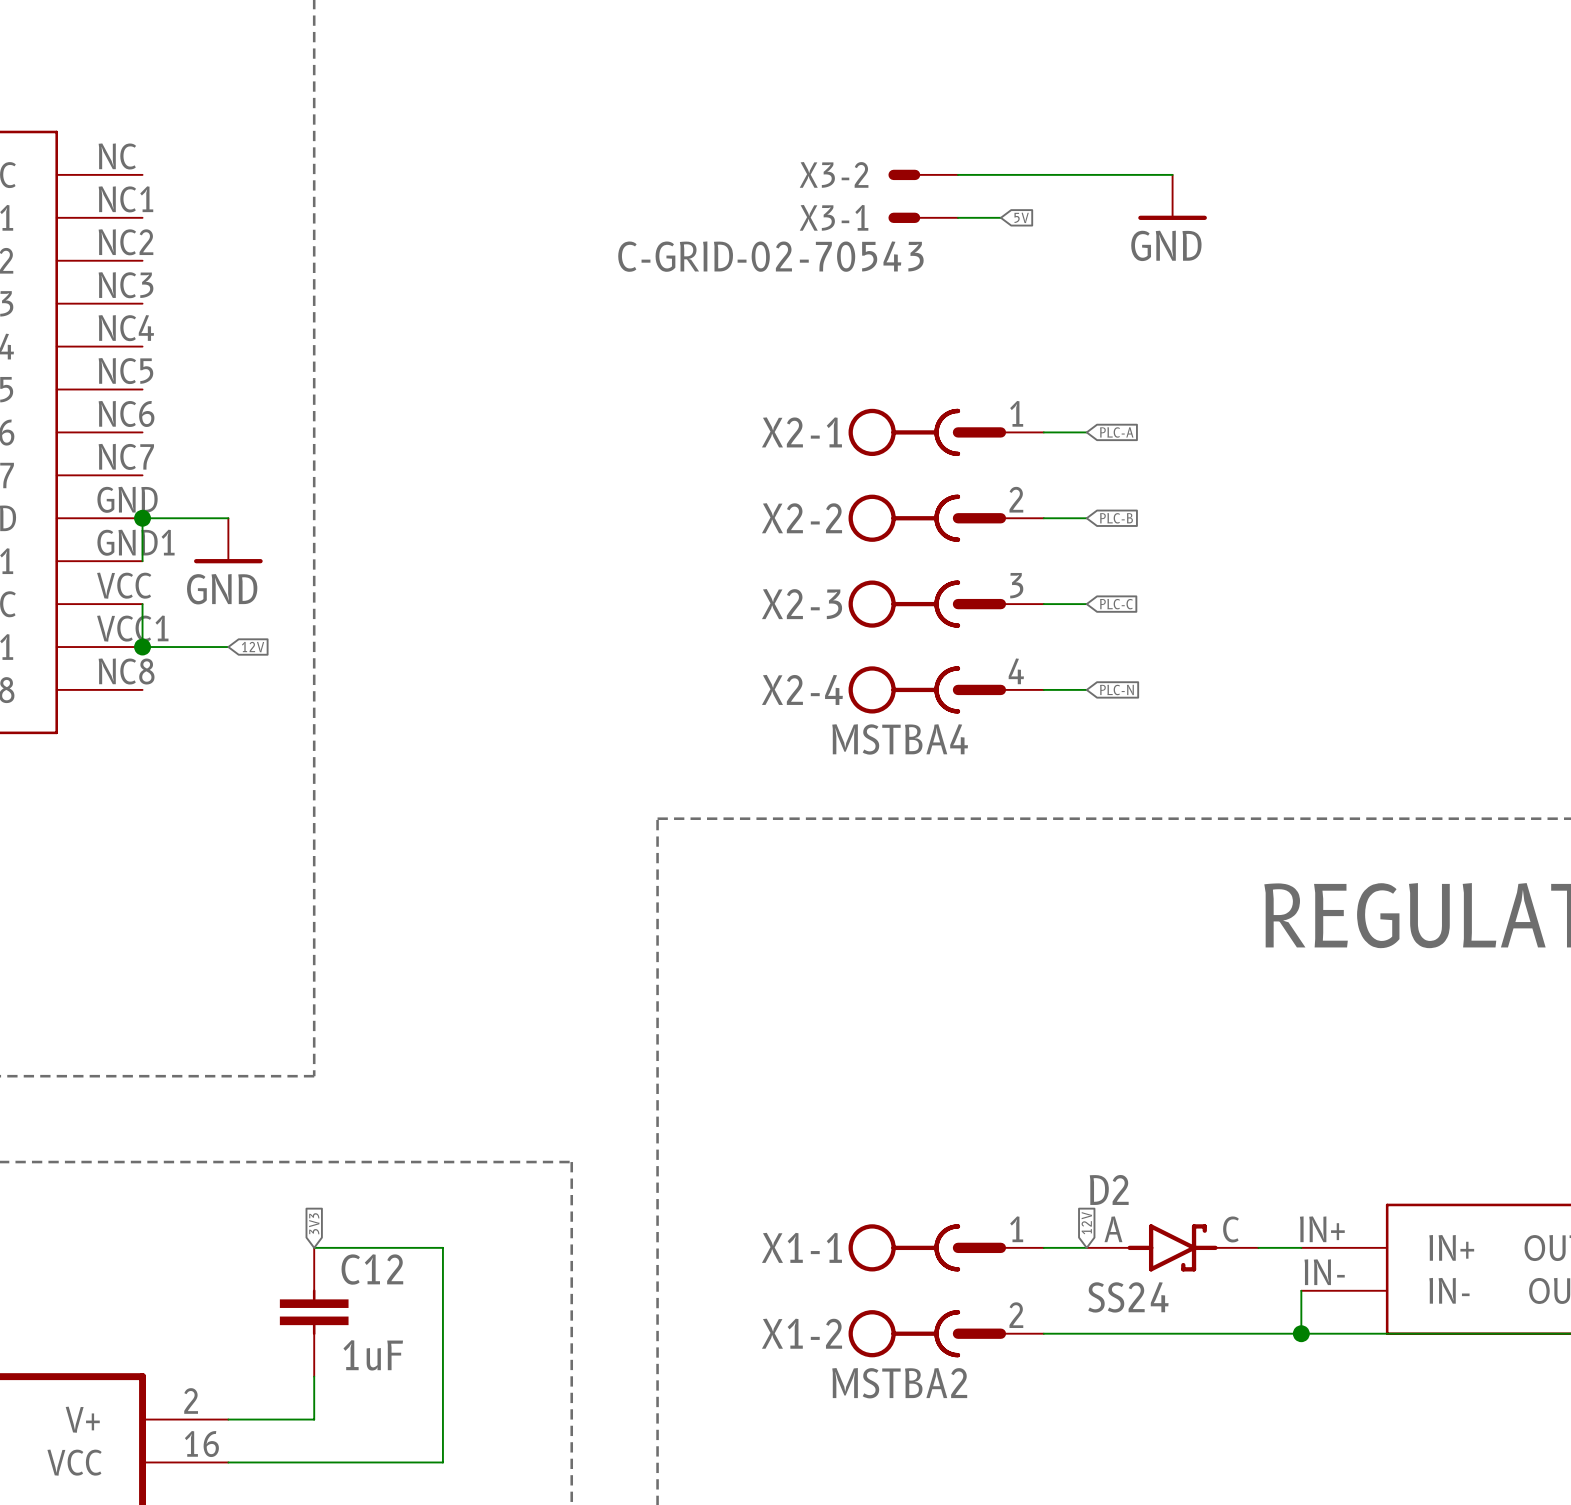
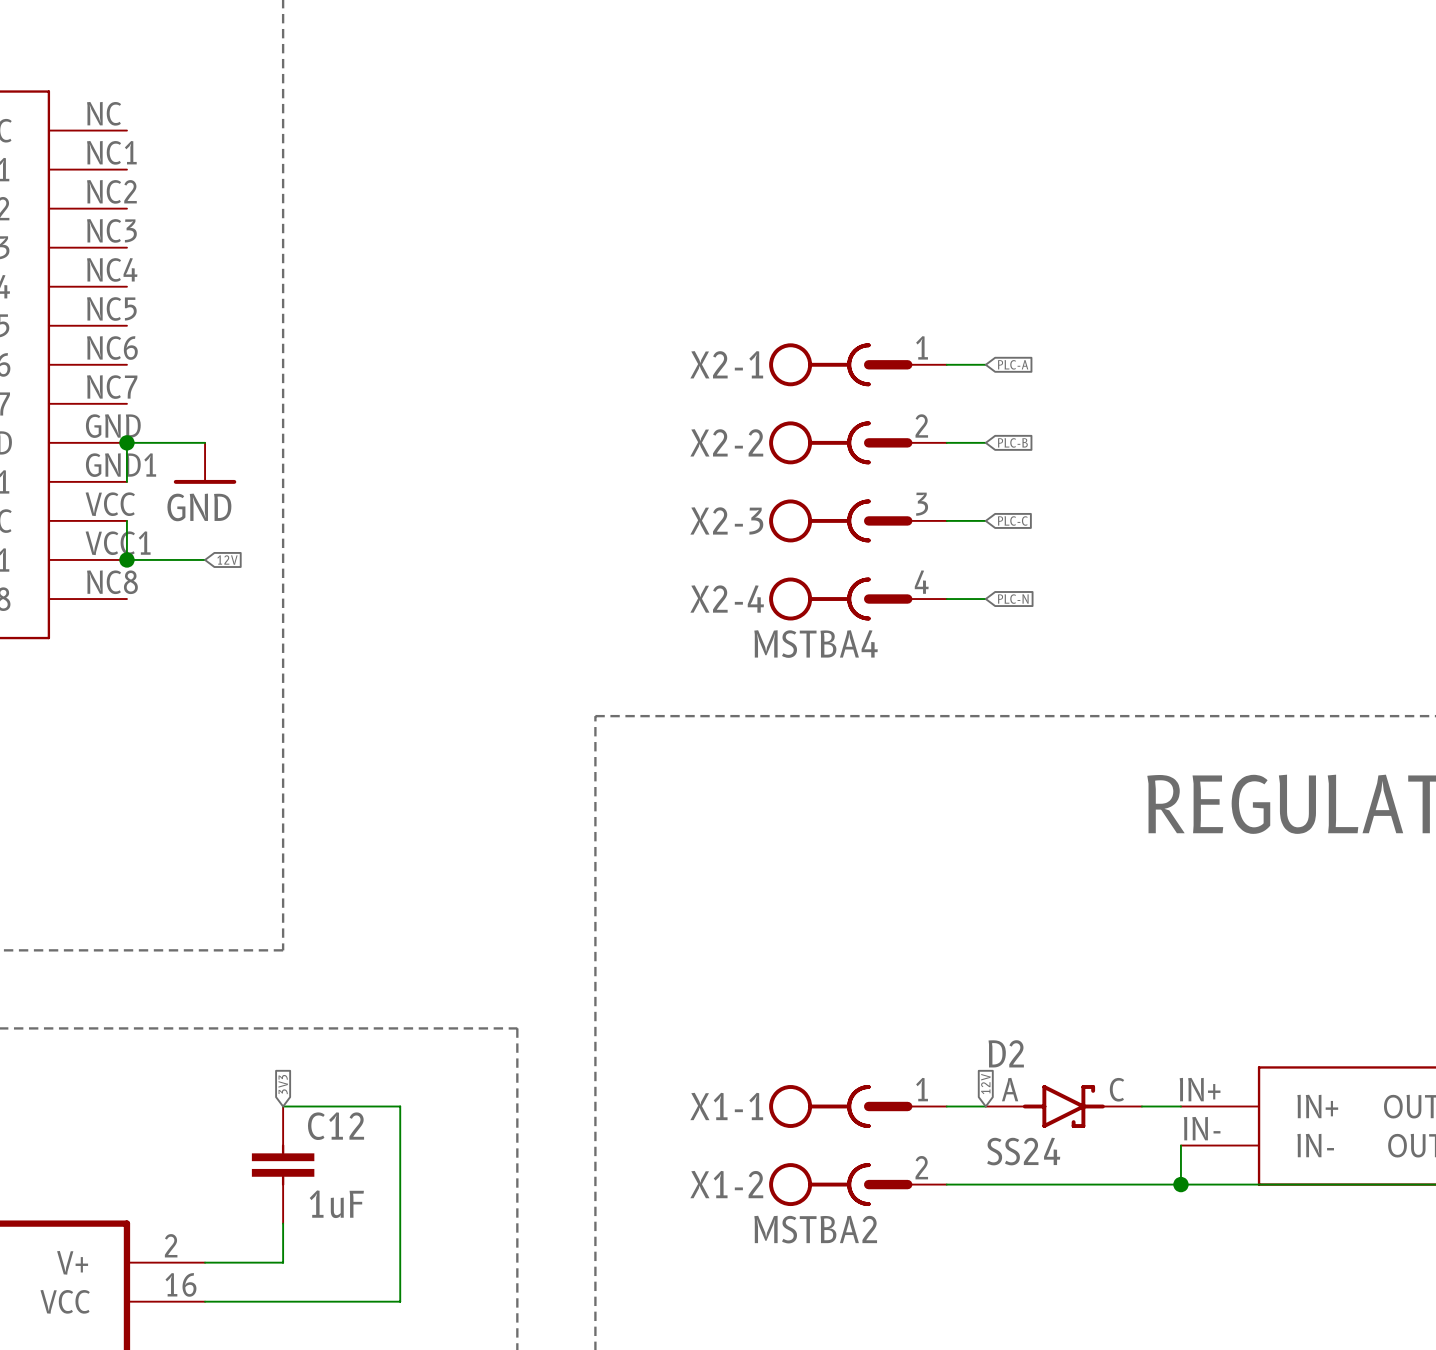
X3-2: (923, 174) -> none
wire: (957, 174) (1172, 174) -> none
power symbol: GND (1172, 197) -> none
X3-1: C-GRID-02-70543 (923, 217) -> none
wire: (957, 217) (1000, 217) -> none
global label: 5V (1021, 217) -> none

